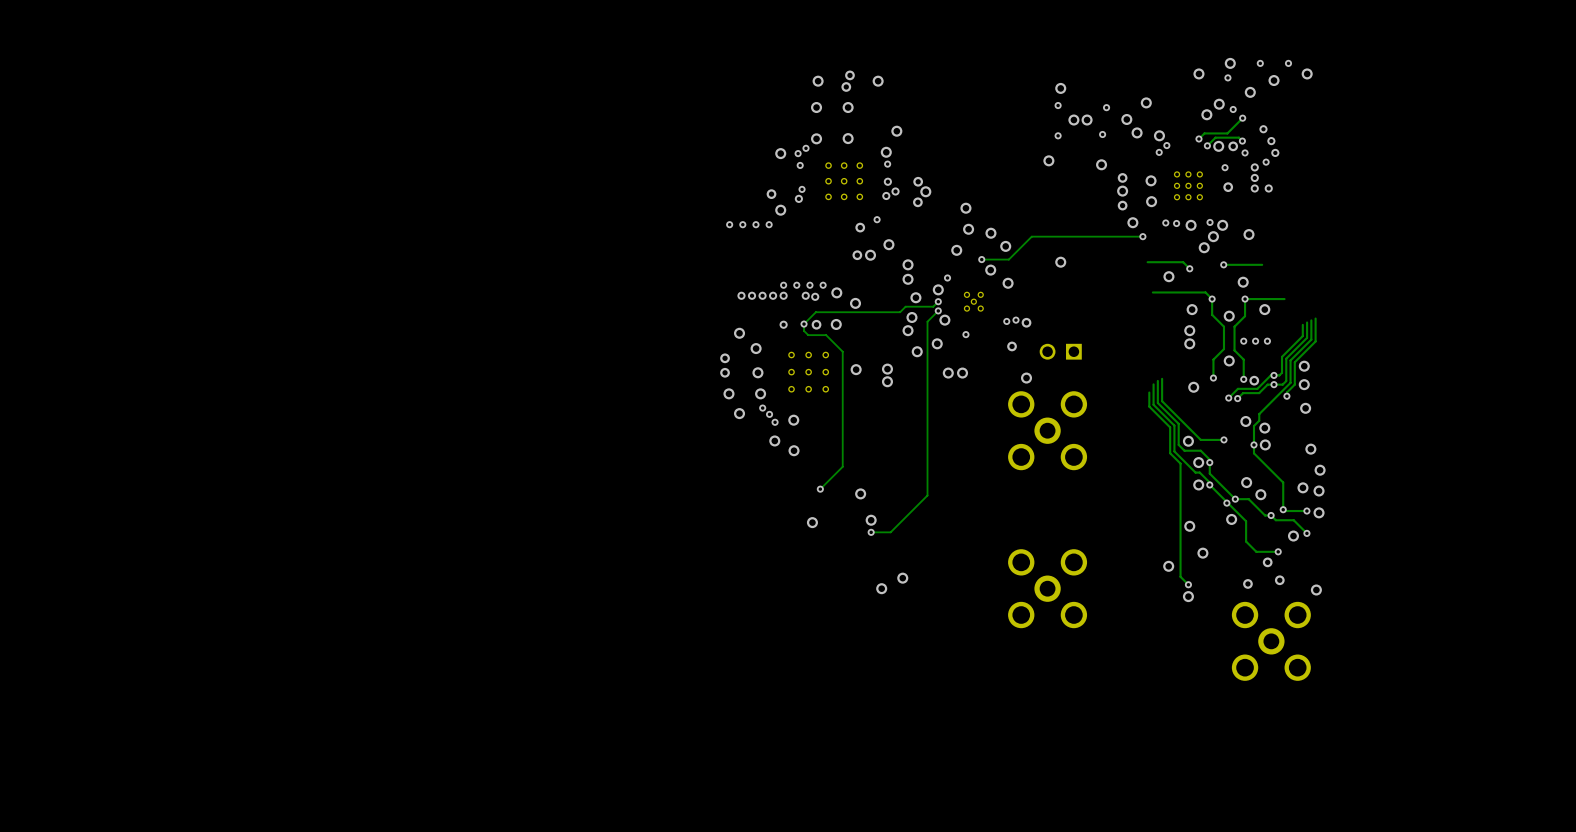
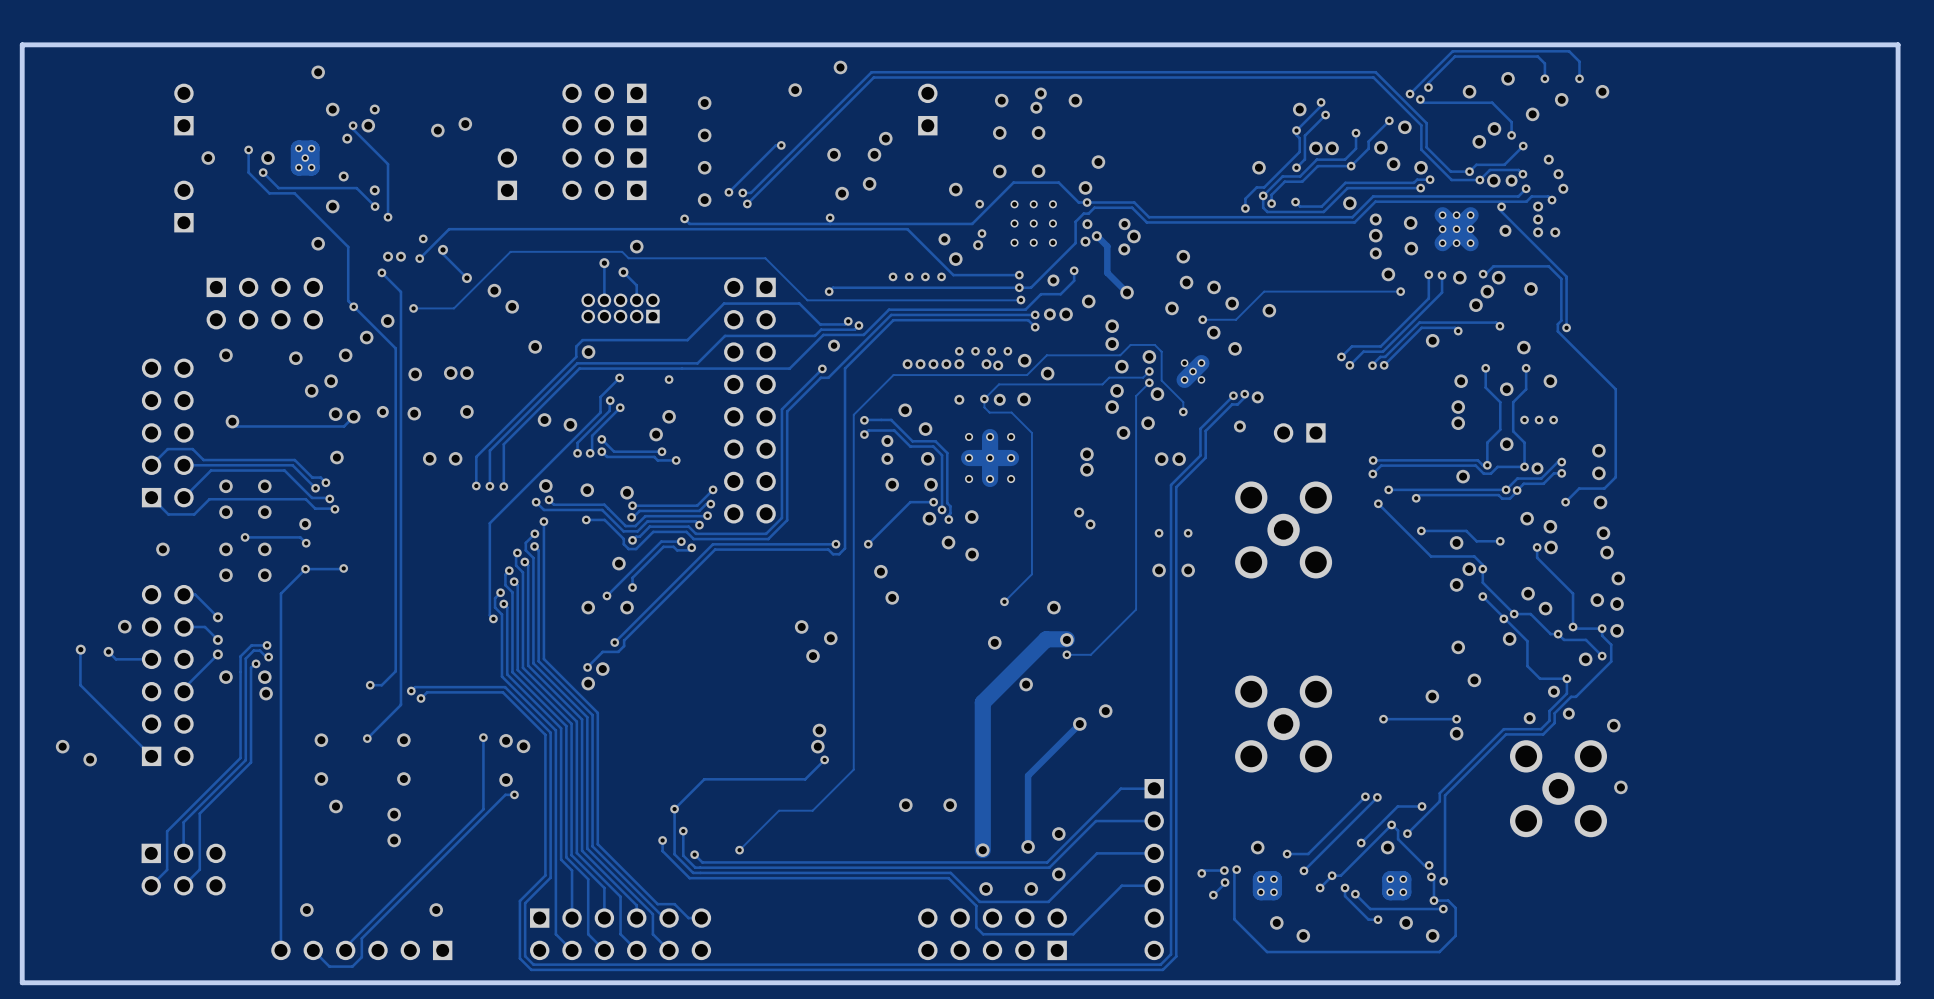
board edge: none -> (1898, 44) (1898, 982) (22, 982) (22, 44) (1898, 44)
via: none -> (840, 67)
via: none -> (318, 72)
track: none -> (1544, 78) (1544, 63) (1537, 56) (1454, 56) (1428, 83) (1428, 87)
track: none -> (1579, 78) (1579, 61) (1569, 51) (1452, 51) (1410, 93)
via: none -> (1428, 87)
via: none -> (795, 90)
part: none -> (604, 93)
via: none -> (1410, 93)
via: (1227, 77) -> none
track: none -> (1420, 99) (1423, 102) (1492, 102) (1511, 122) (1511, 135)
via: none -> (1420, 99)
track: none -> (1321, 102) (1321, 105) (1296, 130) (1296, 135) (1299, 138) (1299, 151) (1264, 187) (1256, 187) (1245, 198) (1245, 208)
via: none -> (1321, 102)
via: none -> (704, 103)
part: none -> (183, 109)
via: none -> (332, 109)
via: none -> (374, 109)
part: none -> (927, 109)
track: none -> (1325, 115) (1304, 135) (1304, 159) (1296, 167)
via: none -> (1325, 115)
track: none -> (1389, 120) (1368, 141) (1368, 148) (1351, 166) (1317, 166) (1302, 181) (1284, 181) (1271, 194) (1271, 203)
via: none -> (1389, 120)
via: none -> (465, 124)
track: none -> (353, 125) (353, 129) (388, 164) (388, 217)
via: none -> (353, 125)
via: none -> (368, 125)
part: none -> (604, 125)
via: none -> (437, 130)
track: none -> (1356, 133) (1356, 148) (1345, 159) (1316, 159) (1300, 176) (1282, 176) (1263, 195) (1263, 207) (1267, 211) (1323, 211) (1347, 188) (1420, 188)
via: none -> (704, 135)
via: none -> (347, 138)
via: none -> (885, 138)
track: none -> (781, 145) (775, 145) (728, 192)
via: none -> (781, 145)
track: none -> (311, 148) (311, 167) (298, 167) (298, 148) (311, 148)
track: none -> (248, 149) (248, 172) (269, 193) (294, 193) (348, 246) (348, 300) (395, 348) (395, 671) (381, 685) (370, 685)
via: none -> (248, 149)
via: none -> (834, 154)
via: none -> (874, 154)
via: none -> (208, 158)
via: none -> (268, 158)
part: none -> (305, 158)
part: none -> (604, 158)
via: none -> (704, 167)
track: none -> (1469, 171) (1450, 171) (1426, 147) (1426, 123) (1375, 72) (871, 72) (750, 192) (742, 192)
track: none -> (263, 172) (278, 188) (356, 188) (375, 206)
via: none -> (263, 172)
part: none -> (507, 174)
via: none -> (343, 176)
track: none -> (1430, 179) (1417, 179) (1413, 182) (1345, 182) (1321, 206) (1300, 206) (1295, 202)
track: none -> (1479, 180) (1451, 180) (1421, 149) (1421, 125) (1373, 77) (873, 77) (747, 203)
via: none -> (869, 183)
via: (806, 148) -> none
track: none -> (1526, 188) (1518, 196) (1373, 196) (1352, 217) (1149, 217) (1134, 202) (1078, 202) (1058, 182) (1013, 182) (972, 223) (689, 223) (684, 218)
via: (798, 153) -> none
via: none -> (374, 190)
part: none -> (604, 190)
via: none -> (728, 192)
via: none -> (742, 192)
via: none -> (842, 193)
via: none -> (1263, 195)
via position: (1048, 160) -> (1259, 167)
via: none -> (704, 200)
track: none -> (1552, 200) (1548, 196) (1531, 196) (1526, 201) (1375, 201) (1354, 222) (1146, 222) (1132, 207) (1094, 207) (1088, 213) (1083, 213) (1075, 221) (1075, 243) (1030, 287) (833, 287) (829, 291)
via: none -> (1295, 202)
via: none -> (747, 203)
via: none -> (1271, 203)
part: none -> (183, 206)
via: none -> (332, 206)
via: none -> (375, 206)
via: none -> (1245, 208)
track: none -> (1499, 210) (1566, 276) (1566, 327)
track: none -> (1442, 215) (1470, 243)
track: none -> (1470, 215) (1442, 243)
via: none -> (388, 217)
via: none -> (830, 217)
via: none -> (684, 218)
track: none -> (1096, 236) (1107, 246) (1107, 272) (1127, 292)
via: none -> (423, 238)
via: none -> (318, 243)
via: none -> (636, 246)
track: none -> (443, 249) (443, 254) (466, 278)
via: none -> (443, 249)
via: none -> (388, 256)
via: none -> (400, 256)
track: none -> (419, 258) (449, 229) (907, 229) (953, 275) (1019, 275)
via: none -> (419, 258)
track: none -> (604, 263) (604, 300)
via: none -> (604, 263)
track: none -> (1074, 270) (1074, 280) (1060, 294) (1041, 294) (1025, 309) (889, 309) (863, 334) (823, 334) (789, 368) (579, 368) (503, 444) (503, 486)
track: none -> (623, 272) (636, 285) (636, 300)
via: none -> (623, 272)
track: none -> (381, 272) (400, 291) (400, 704) (367, 738)
via: none -> (381, 272)
track: none -> (1428, 274) (1428, 298) (1380, 346) (1351, 346) (1341, 356)
track: none -> (1483, 274) (1485, 274) (1493, 266) (1548, 266) (1561, 278) (1561, 320) (1557, 324) (1557, 331) (1615, 389) (1615, 477) (1604, 488) (1579, 488) (1565, 502)
via: none -> (1019, 275)
track: none -> (1442, 275) (1442, 292) (1382, 351) (1363, 351) (1349, 365)
via: none -> (466, 278)
via: none -> (1019, 287)
via: none -> (494, 290)
via: none -> (829, 291)
via: none -> (1127, 292)
track: none -> (1020, 300) (807, 300) (765, 258) (628, 258) (622, 251) (510, 251) (454, 308) (413, 308)
via: none -> (1020, 300)
part: none -> (264, 303)
via: none -> (353, 306)
via: none -> (512, 306)
via: none -> (413, 308)
part: none -> (620, 308)
track: none -> (1035, 314) (891, 314) (828, 377) (820, 377) (787, 411) (787, 520) (768, 539) (693, 539) (686, 531) (653, 531) (636, 549) (628, 549) (623, 544) (623, 539) (604, 519) (586, 519)
via: none -> (1035, 314)
via: none -> (387, 321)
track: none -> (848, 321) (845, 324) (820, 324) (799, 303) (724, 303) (687, 340) (582, 340) (576, 346) (576, 356) (476, 456) (476, 485)
via: none -> (848, 321)
via position: (1060, 262) -> (1269, 310)
track: (1147, 262) (1183, 262) (1187, 266) -> (1384, 365) (1421, 327) (1454, 327)
track: none -> (858, 325) (854, 329) (821, 329) (814, 335) (725, 335) (697, 363) (577, 363) (489, 450) (489, 486)
via: none -> (858, 325)
track: (1262, 264) (1223, 264) -> (1372, 365) (1380, 356) (1385, 356) (1419, 322) (1496, 322) (1499, 326)
track: none -> (1035, 327) (1028, 320) (893, 320) (845, 368) (845, 548) (839, 554) (833, 554) (828, 549) (715, 549) (624, 640) (624, 646) (618, 651) (602, 651) (587, 667)
via: none -> (1035, 327)
via: none -> (1566, 327)
via: none -> (366, 337)
via: (947, 278) -> none
via: none -> (834, 345)
via: none -> (535, 346)
via: none -> (588, 352)
via: none -> (225, 355)
via: none -> (345, 355)
via: none -> (1341, 356)
via: none -> (295, 358)
track: (1152, 292) (1205, 292) (1212, 299) -> none
track: none -> (1201, 363) (1184, 379)
via: none -> (1349, 365)
via: none -> (1372, 365)
via: none -> (1384, 365)
track: none -> (822, 368) (781, 409) (781, 518) (766, 533) (695, 533) (688, 526) (649, 526) (639, 536) (636, 536) (632, 540)
via: none -> (822, 368)
track: (1284, 299) (1245, 299) -> none
via: none -> (450, 373)
via: none -> (466, 373)
via: none -> (415, 374)
track: none -> (619, 377) (600, 397) (600, 412) (489, 523) (489, 615) (493, 618)
via: none -> (619, 377)
via: none -> (669, 379)
via: none -> (331, 381)
via: none -> (311, 390)
track: (1315, 318) (1315, 341) (1294, 362) (1294, 384) (1286, 392) (1286, 396) -> none
track: none -> (1244, 394) (1244, 397) (1237, 404) (1232, 404) (1205, 430) (1205, 457) (1176, 487) (1176, 956) (1162, 969) (531, 969) (519, 958) (519, 901) (545, 875) (545, 734) (502, 692) (427, 692) (421, 698)
track: (1311, 320) (1311, 339) (1290, 360) (1290, 382) (1259, 414) (1259, 420) (1254, 425) (1254, 444) -> none
track: none -> (1233, 395) (1200, 428) (1200, 455) (1171, 485) (1171, 954) (1160, 964) (533, 964) (525, 956) (525, 903) (550, 877) (550, 732) (505, 687) (415, 687) (411, 691)
track: (1307, 322) (1307, 337) (1286, 358) (1286, 381) (1282, 384) (1274, 384) -> none
track: (1302, 324) (1302, 336) (1282, 356) (1282, 372) (1279, 375) (1274, 375) -> none
track: none -> (610, 400) (609, 410) (577, 442) (577, 453)
via: none -> (610, 400)
part: none -> (749, 400)
track: none -> (620, 407) (592, 435) (592, 451) (590, 453)
via: none -> (620, 407)
via: none -> (382, 411)
via: none -> (466, 411)
track: none -> (1183, 411) (1183, 402) (1161, 380) (1161, 351) (1154, 344) (1130, 344) (1120, 355) (1046, 355) (1027, 375) (893, 375) (853, 414) (853, 769) (812, 810) (779, 810) (739, 850)
via: none -> (335, 414)
via: none -> (414, 413)
track: none -> (353, 416) (344, 426) (237, 426) (232, 421)
via: none -> (353, 416)
via: none -> (669, 416)
via: none -> (544, 420)
track: none -> (864, 420) (891, 419) (912, 441) (935, 441) (947, 453) (947, 503) (950, 506) (948, 519)
via: none -> (864, 420)
via: none -> (232, 421)
via: none -> (570, 424)
part: none -> (167, 432)
via: none -> (656, 434)
track: none -> (864, 434) (868, 430) (894, 430) (910, 446) (933, 446) (942, 455) (942, 509)
via: none -> (864, 434)
track: none -> (990, 436) (990, 479)
track: none -> (601, 439) (614, 451) (661, 451)
via: none -> (601, 439)
track: none -> (601, 451) (607, 456) (654, 456) (657, 460) (676, 460)
via: none -> (601, 451)
via: none -> (661, 451)
via: none -> (577, 453)
via: none -> (590, 453)
via: (856, 369) -> none
via: none -> (336, 457)
via: none -> (429, 458)
via: none -> (455, 458)
track: none -> (1011, 458) (969, 458)
via: none -> (676, 460)
track: none -> (1373, 460) (1477, 460) (1482, 465) (1487, 465)
via: none -> (1373, 460)
track: none -> (151, 465) (167, 449) (192, 449) (203, 460) (294, 460) (312, 477) (320, 477) (325, 482)
track: none -> (183, 465) (292, 465) (315, 488)
via: (1026, 378) -> none
track: (1162, 378) (1162, 401) (1200, 439) (1204, 439) -> (1421, 530) (1466, 530) (1476, 541)
track: none -> (1524, 466) (1497, 466) (1490, 473) (1483, 473) (1475, 465) (1381, 465) (1372, 474)
track: (1157, 380) (1157, 403) (1178, 423) (1178, 444) (1184, 450) (1200, 450) (1209, 459) -> (1378, 503) (1431, 556) (1474, 556) (1482, 565)
track: (1153, 384) (1153, 404) (1174, 425) (1174, 451) (1195, 472) (1199, 472) (1209, 484) -> none
via: none -> (1372, 474)
via: none -> (325, 482)
track: (1149, 392) (1149, 406) (1170, 427) (1170, 453) (1180, 463) (1180, 576) (1188, 584) -> (1383, 719) (1456, 719)
via: none -> (476, 485)
via: none -> (545, 485)
via: none -> (225, 486)
via: none -> (264, 486)
via: none -> (489, 486)
via: none -> (503, 486)
via: none -> (315, 488)
via position: (1286, 396) -> (1565, 502)
via: none -> (587, 490)
track: none -> (713, 489) (697, 505) (632, 505)
via: none -> (713, 489)
via: none -> (1388, 489)
track: none -> (1506, 489) (1388, 489)
track: none -> (1517, 490) (1509, 498) (1502, 498) (1498, 495) (1419, 495) (1416, 498)
via: none -> (627, 492)
track: none -> (151, 497) (168, 514) (194, 514) (209, 499) (305, 499) (315, 508) (334, 509)
track: none -> (183, 497) (211, 470) (284, 470) (312, 497) (329, 498)
via: none -> (1416, 498)
via: none -> (329, 498)
track: none -> (549, 499) (553, 504) (604, 504) (625, 526) (635, 526) (645, 516) (707, 515)
via: none -> (549, 499)
track: none -> (536, 502) (543, 509) (602, 509) (623, 531) (637, 531) (647, 521) (695, 521) (699, 525)
via: none -> (536, 502)
track: none -> (933, 502) (910, 502) (868, 544)
track: none -> (710, 504) (706, 504) (699, 510) (639, 510) (631, 517)
via: none -> (710, 504)
via: none -> (1378, 503)
via: none -> (632, 505)
via: none -> (334, 509)
via position: (739, 413) -> (929, 518)
via: none -> (225, 512)
via: none -> (264, 512)
via: none -> (1079, 512)
via: none -> (707, 515)
via: none -> (631, 517)
via: none -> (586, 519)
track: none -> (543, 521) (543, 659) (597, 712) (597, 844) (657, 904) (674, 904) (688, 918) (701, 918)
via: none -> (543, 521)
via: none -> (305, 524)
via: none -> (699, 525)
via: none -> (1090, 524)
via: none -> (1421, 530)
track: none -> (534, 533) (525, 542) (525, 550) (533, 557) (533, 663) (587, 717) (587, 848) (652, 914) (652, 934) (669, 950)
via: none -> (534, 533)
via: none -> (1159, 533)
via: none -> (1188, 533)
via: none -> (1603, 533)
track: none -> (245, 537) (300, 537) (306, 543)
via: none -> (245, 537)
via: none -> (632, 540)
track: none -> (681, 541) (661, 541) (606, 595)
via: none -> (681, 541)
via: none -> (306, 543)
track: none -> (835, 544) (712, 544) (614, 642)
via: none -> (835, 544)
via: none -> (868, 544)
track: none -> (534, 546) (538, 550) (538, 661) (592, 715) (592, 846) (664, 918) (669, 918)
via: none -> (534, 546)
track: none -> (691, 547) (689, 550) (677, 550) (673, 546) (663, 546) (632, 577) (632, 587)
via: none -> (691, 547)
via: none -> (162, 549)
via: none -> (225, 549)
via: none -> (264, 549)
track: none -> (517, 552) (516, 565) (522, 572) (522, 667) (576, 721) (576, 853) (620, 896) (620, 934) (636, 950)
via: none -> (517, 552)
track: none -> (524, 561) (528, 565) (528, 665) (582, 719) (582, 850) (636, 905) (636, 918)
via: none -> (524, 561)
via: none -> (618, 563)
via: none -> (305, 569)
track: none -> (343, 568) (305, 569) (280, 593) (280, 950)
via: none -> (343, 568)
track: none -> (509, 570) (505, 574) (505, 585) (512, 592) (512, 672) (566, 726) (566, 857) (588, 879) (588, 934) (604, 950)
via: none -> (509, 570)
via: none -> (1159, 570)
via: none -> (1188, 570)
via: none -> (880, 571)
via: none -> (225, 575)
via: none -> (264, 575)
track: none -> (514, 581) (517, 585) (517, 670) (571, 723) (571, 855) (604, 888) (604, 918)
via: none -> (514, 581)
via: none -> (632, 587)
track: none -> (500, 592) (495, 598) (495, 607) (502, 614) (502, 676) (555, 730) (555, 934) (572, 950)
via: none -> (500, 592)
track: none -> (183, 594) (195, 594) (217, 617)
via: none -> (606, 595)
via position: (1198, 484) -> (1456, 584)
via: none -> (892, 597)
track: none -> (503, 604) (507, 607) (507, 674) (561, 728) (561, 859) (572, 870) (572, 918)
via: none -> (503, 604)
via: none -> (588, 607)
via: none -> (627, 607)
via: none -> (217, 617)
via: none -> (493, 618)
via: none -> (124, 626)
track: none -> (183, 627) (204, 627) (217, 639)
via: none -> (801, 627)
track: none -> (1602, 628) (1602, 635) (1611, 644) (1611, 661) (1575, 696) (1571, 696) (1554, 713) (1554, 722) (1543, 734) (1506, 734) (1445, 795) (1443, 881)
via: none -> (830, 638)
track: none -> (1066, 639) (1046, 639) (982, 702) (982, 850)
via: none -> (217, 639)
via: none -> (614, 642)
track: none -> (267, 645) (251, 645) (240, 656) (240, 757) (167, 831) (167, 869) (151, 885)
via: none -> (267, 645)
track: none -> (80, 649) (80, 685) (151, 756)
via: none -> (80, 649)
track: none -> (108, 651) (116, 659) (151, 659)
via: none -> (108, 651)
track: none -> (217, 654) (183, 688) (183, 691)
via: none -> (217, 654)
via: none -> (813, 656)
track: none -> (268, 657) (259, 650) (253, 650) (245, 658) (245, 760) (183, 822) (183, 853)
via: none -> (268, 657)
track: none -> (256, 663) (251, 667) (251, 762) (199, 813) (199, 869) (183, 885)
via: none -> (256, 663)
via: none -> (587, 667)
via: none -> (602, 669)
part: none -> (167, 675)
via: none -> (225, 677)
via: none -> (264, 677)
track: none -> (1566, 678) (1566, 693) (1549, 711) (1549, 720) (1541, 729) (1503, 729) (1439, 793) (1439, 801) (1407, 833)
via: none -> (588, 683)
via: none -> (1026, 684)
via: none -> (370, 685)
via: none -> (411, 691)
via: none -> (266, 693)
via: none -> (421, 698)
via: none -> (1383, 719)
track: none -> (1079, 724) (1028, 775) (1028, 846)
via: none -> (819, 730)
track: none -> (483, 737) (483, 809) (345, 947) (345, 950)
via: none -> (483, 737)
via: none -> (367, 738)
via: none -> (321, 740)
via: none -> (403, 740)
via: none -> (506, 740)
via: none -> (523, 746)
via: none -> (62, 746)
via: none -> (817, 746)
via: none -> (90, 759)
track: none -> (824, 759) (805, 779) (704, 779) (674, 809) (674, 854) (693, 872) (950, 872) (979, 901) (1048, 901) (1096, 853) (1154, 853)
via: none -> (824, 759)
via: none -> (321, 779)
via: none -> (403, 779)
via: none -> (506, 779)
via: none -> (1620, 787)
track: none -> (1154, 788) (1120, 788) (1047, 862) (702, 862) (694, 854)
track: none -> (514, 794) (505, 794) (361, 938) (361, 957) (352, 966) (329, 966) (313, 950)
via: none -> (514, 794)
track: none -> (1365, 796) (1308, 854) (1287, 854)
via: none -> (1365, 796)
track: none -> (1377, 797) (1303, 870)
via: none -> (1377, 797)
via: none -> (905, 805)
via: none -> (950, 805)
via: none -> (335, 806)
track: none -> (1422, 806) (1397, 806) (1361, 843)
via: none -> (1422, 806)
via: none -> (674, 809)
via: none -> (394, 814)
track: none -> (1154, 821) (1095, 821) (1049, 867) (695, 867) (683, 855) (683, 831)
via: none -> (1391, 824)
via: none -> (683, 831)
via: none -> (1407, 833)
via: none -> (1058, 833)
via: none -> (394, 840)
track: none -> (662, 840) (662, 851) (689, 878) (948, 878) (976, 905) (976, 927) (983, 934) (1073, 934) (1121, 885) (1154, 885)
via: none -> (662, 840)
via: none -> (1361, 843)
via: none -> (1028, 846)
via: none -> (1257, 847)
via: none -> (1387, 847)
via: none -> (739, 850)
via: none -> (982, 850)
via: none -> (1287, 854)
via: none -> (694, 854)
track: none -> (1429, 865) (1424, 865) (1398, 839) (1398, 830) (1391, 824) (1340, 875) (1332, 875) (1320, 888)
via: none -> (1429, 865)
part: none -> (183, 869)
part: none -> (1154, 869)
track: none -> (1224, 870) (1204, 870) (1201, 873)
via: none -> (1224, 870)
track: none -> (1236, 869) (1234, 871) (1234, 919) (1267, 952) (1439, 952) (1455, 935) (1455, 908) (1448, 900) (1433, 900) (1433, 879) (1431, 877)
via: none -> (1236, 869)
via: none -> (1303, 870)
via: none -> (1201, 873)
via: none -> (1058, 874)
via: none -> (1332, 875)
via: none -> (1431, 877)
track: none -> (1273, 879) (1273, 892) (1260, 892) (1260, 879) (1273, 879)
track: none -> (1403, 879) (1403, 892) (1390, 892) (1390, 879) (1403, 879)
via: none -> (1443, 881)
track: none -> (1225, 882) (1213, 895)
via: none -> (1225, 882)
part: none -> (1267, 885)
part: none -> (1396, 885)
via: none -> (986, 888)
via: none -> (1031, 888)
via: none -> (1320, 888)
track: none -> (1345, 888) (1345, 896) (1368, 919) (1378, 919)
via: none -> (1345, 888)
via: none -> (1213, 895)
track: none -> (1355, 894) (1370, 909) (1443, 909)
via: none -> (1355, 894)
via: none -> (1433, 900)
via: none -> (1443, 909)
via: none -> (306, 909)
via: none -> (436, 909)
via: none -> (1378, 919)
via: none -> (1276, 922)
via: none -> (1406, 922)
part: none -> (620, 934)
part: none -> (992, 934)
via: none -> (1303, 935)
via: none -> (1432, 935)
part: none -> (361, 950)

